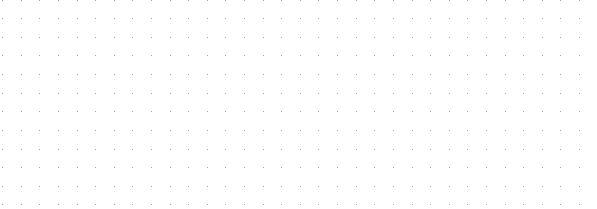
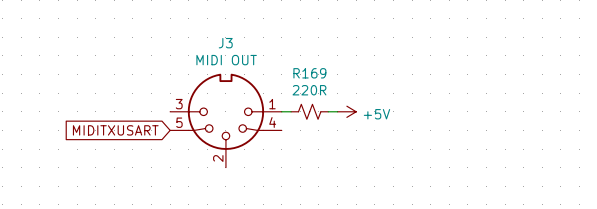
wire: none -> (281, 111) (291, 111)
R169: none -> 220R (309, 111)
wire: none -> (328, 111) (337, 111)
power symbol: none -> +5V (346, 111)
J3: none -> MIDI OUT (225, 120)
global label: none -> MIDITXUSART (115, 130)

